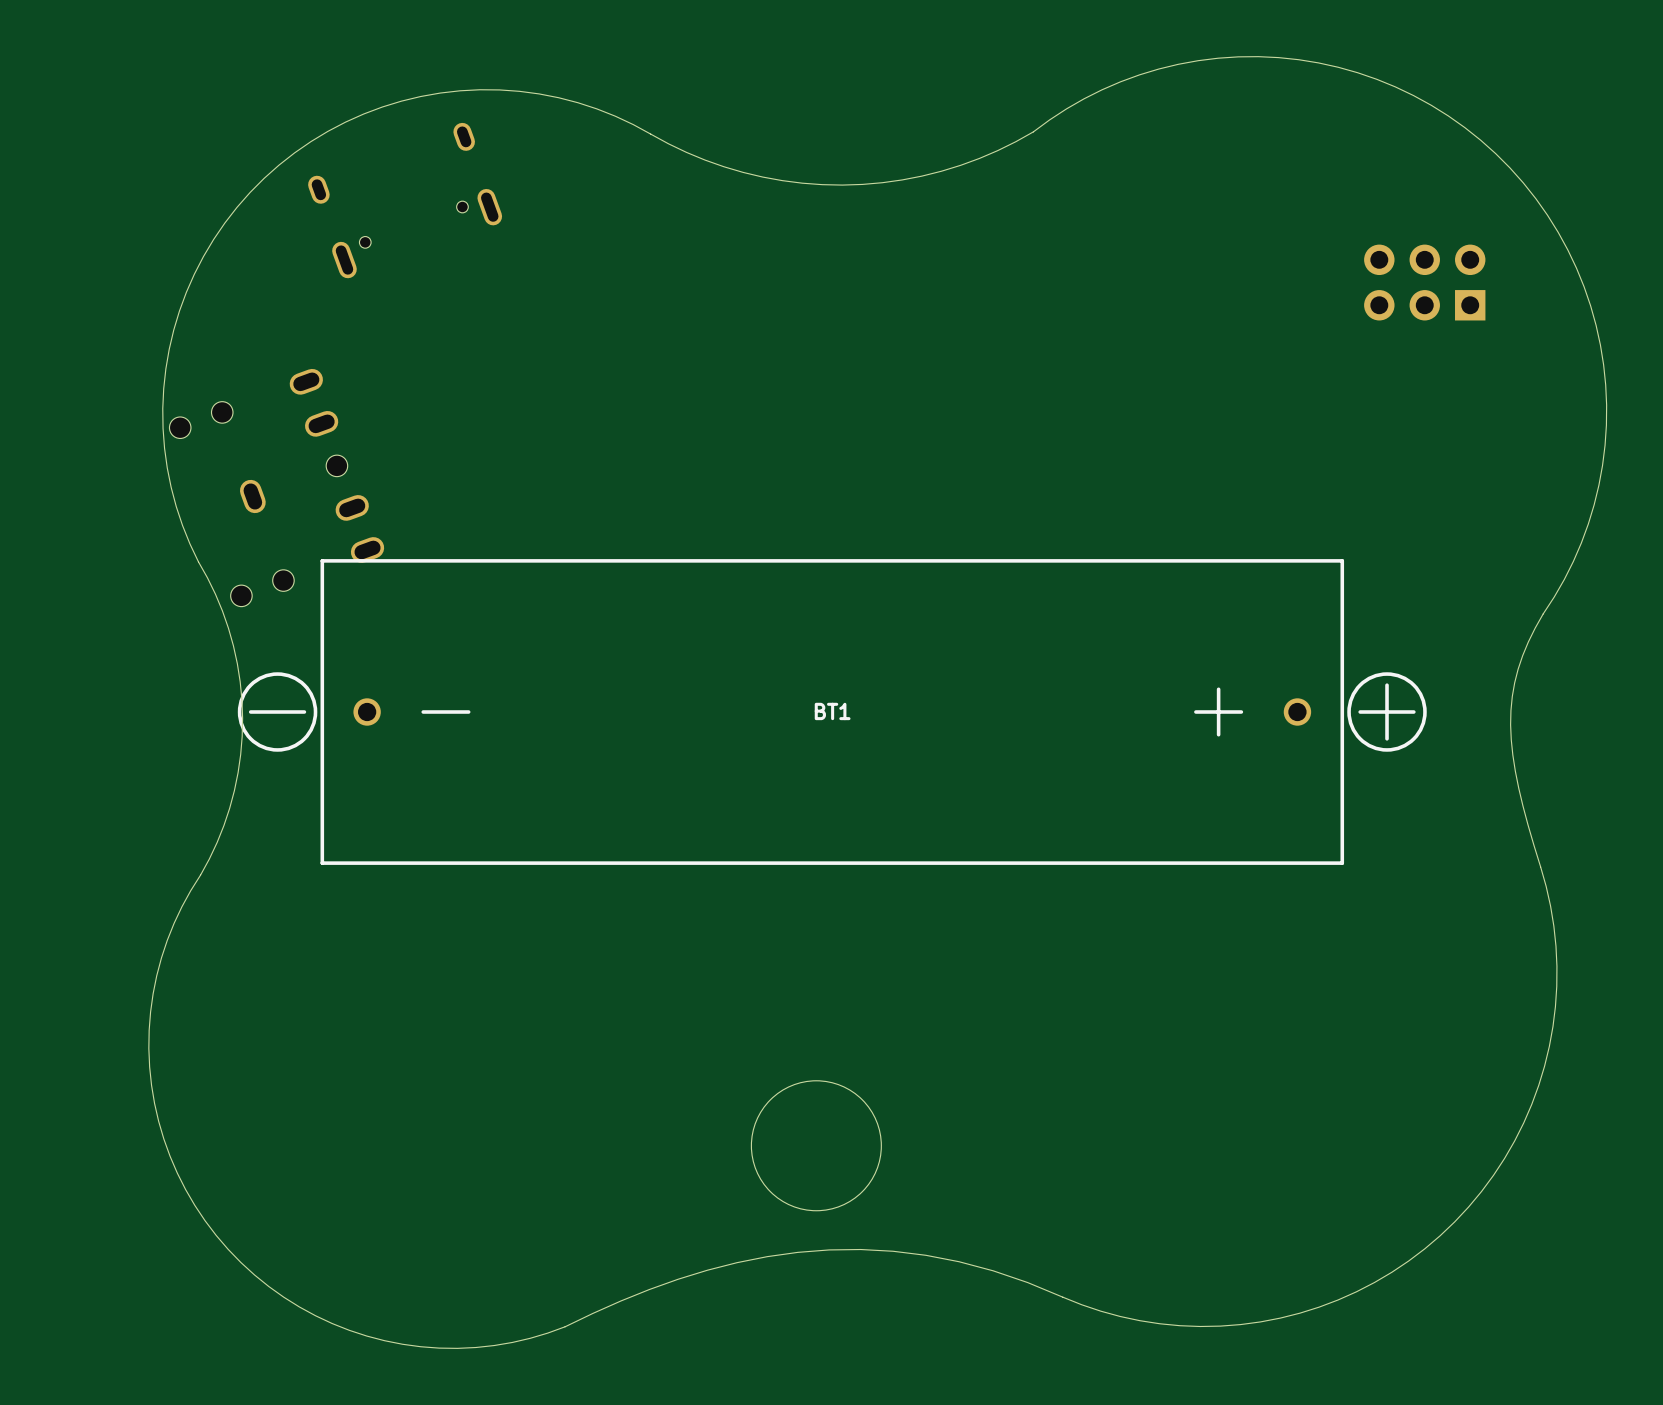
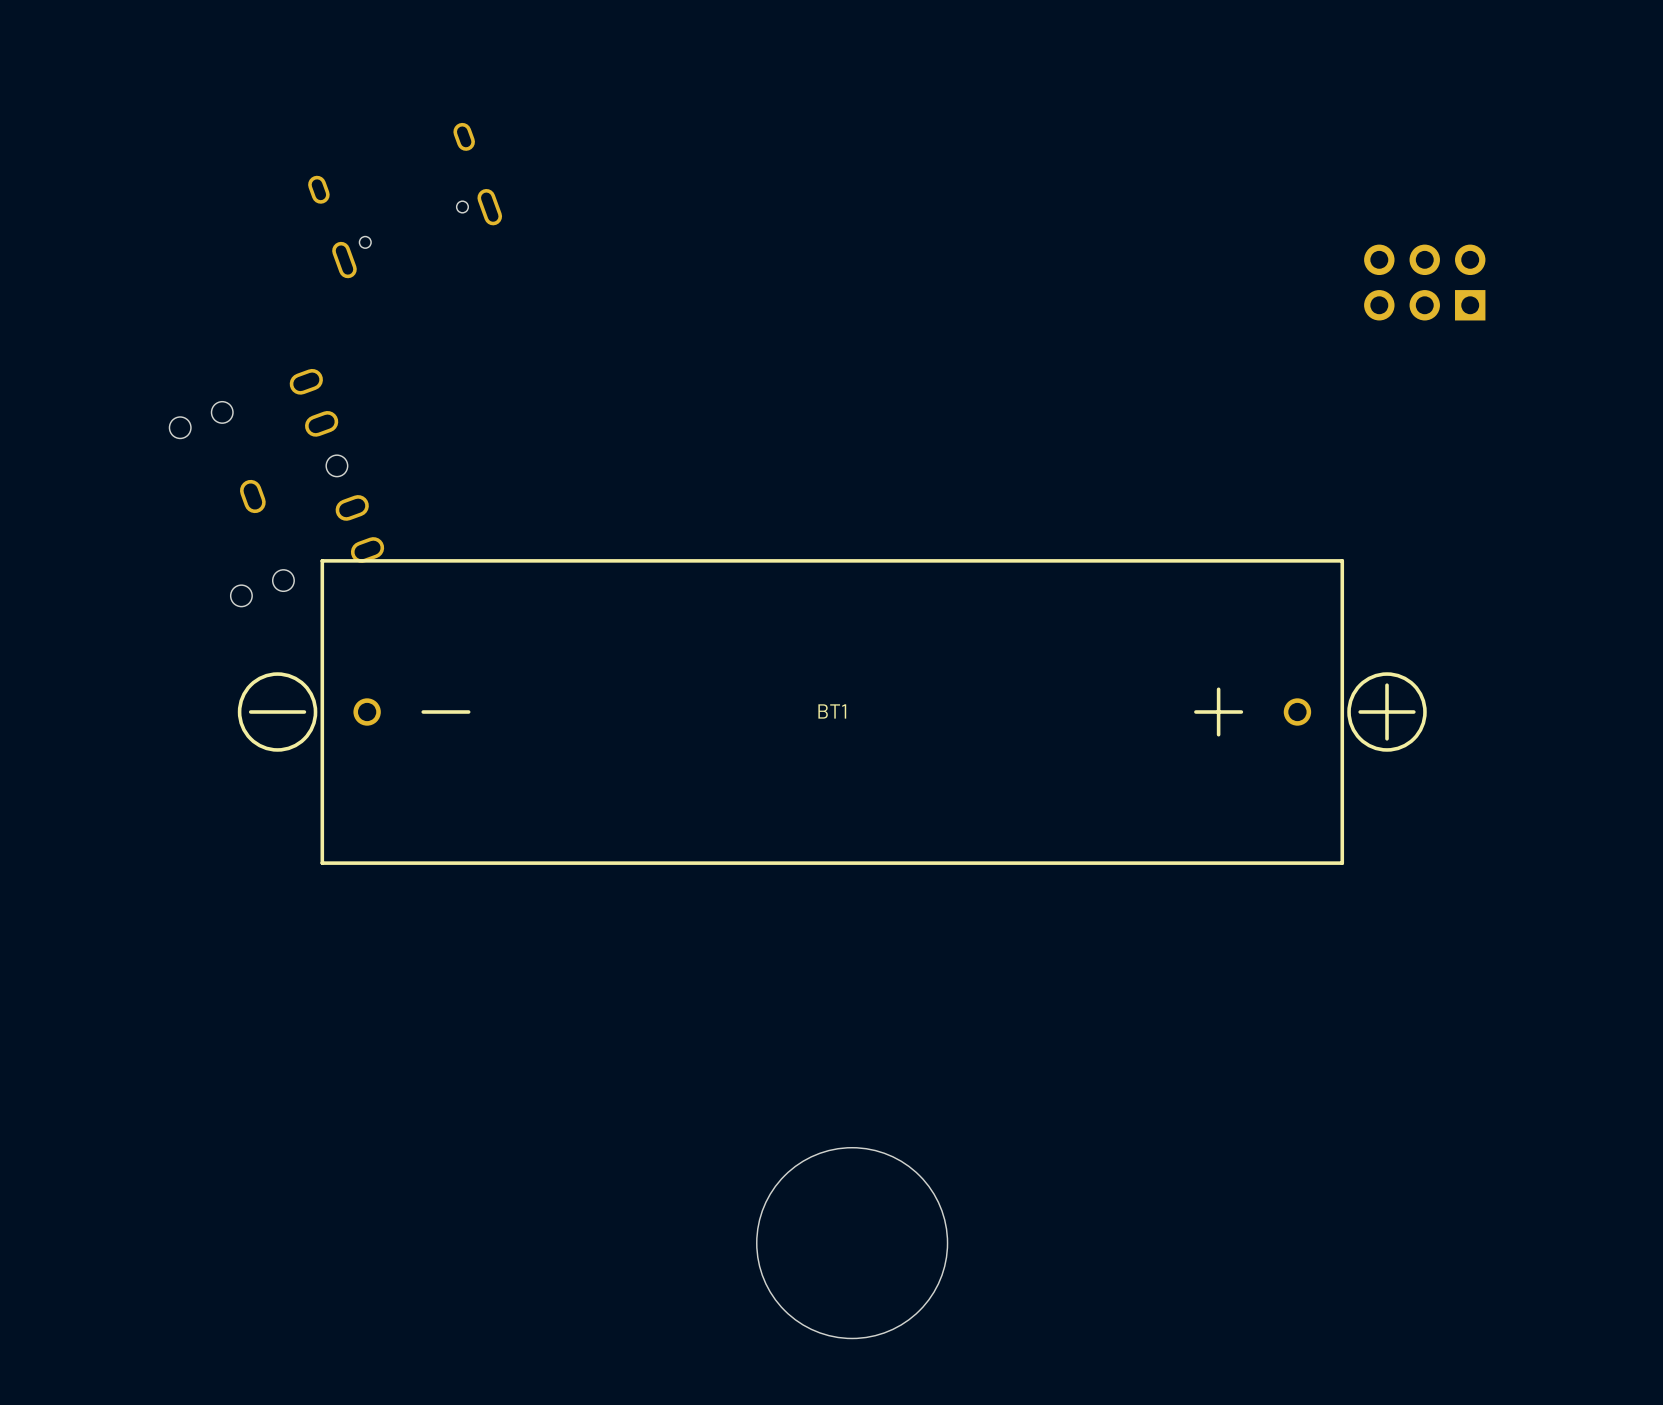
board edge: (1033, 131) (997, 150) (941, 171) (882, 182) (822, 184) (782, 180) (723, 166) (686, 152) (615, 116) (558, 97) (499, 89) (440, 93) (401, 101) (363, 113) (310, 141) (264, 178) (237, 207) (213, 239) (186, 292) (173, 330) (163, 388) (163, 428) (167, 467) (176, 506) (189, 543) (222, 611) (233, 645) (241, 699) (242, 736) (234, 790) (223, 825) (209, 859) (174, 923) (161, 957) (150, 1011) (149, 1066) (158, 1121) (170, 1156) (185, 1189) (205, 1220) (228, 1249) (254, 1274) (283, 1297) (315, 1315) (366, 1336) (420, 1346) (475, 1347) (512, 1342) (547, 1333) (649, 1289) (737, 1262) (797, 1252) (860, 1249) (925, 1255) (959, 1261) (1027, 1282) (1100, 1311) (1139, 1320) (1200, 1326) (1240, 1324) (1280, 1318) (1319, 1307) (1356, 1291) (1391, 1272) (1424, 1248) (1454, 1221) (1481, 1191) (1504, 1158) (1523, 1122) (1538, 1085) (1549, 1046) (1556, 986) (1555, 946) (1550, 906) (1523, 806) (1512, 755) (1510, 724) (1512, 696) (1518, 669) (1528, 641) (1564, 579) (1581, 543) (1594, 504) (1605, 445) (1606, 405) (1603, 364) (1590, 305) (1576, 268) (1558, 232) (1535, 198) (1509, 167) (1480, 140) (1448, 115) (1413, 95) (1376, 79) (1338, 67) (1298, 59) (1258, 56) (1218, 58) (1178, 64) (1139, 74) (1102, 89) (1066, 108) (1033, 131) -> none
round board edge: [750, 1080, 882, 1212] -> none
round board edge: none -> [756, 1147, 948, 1339]

